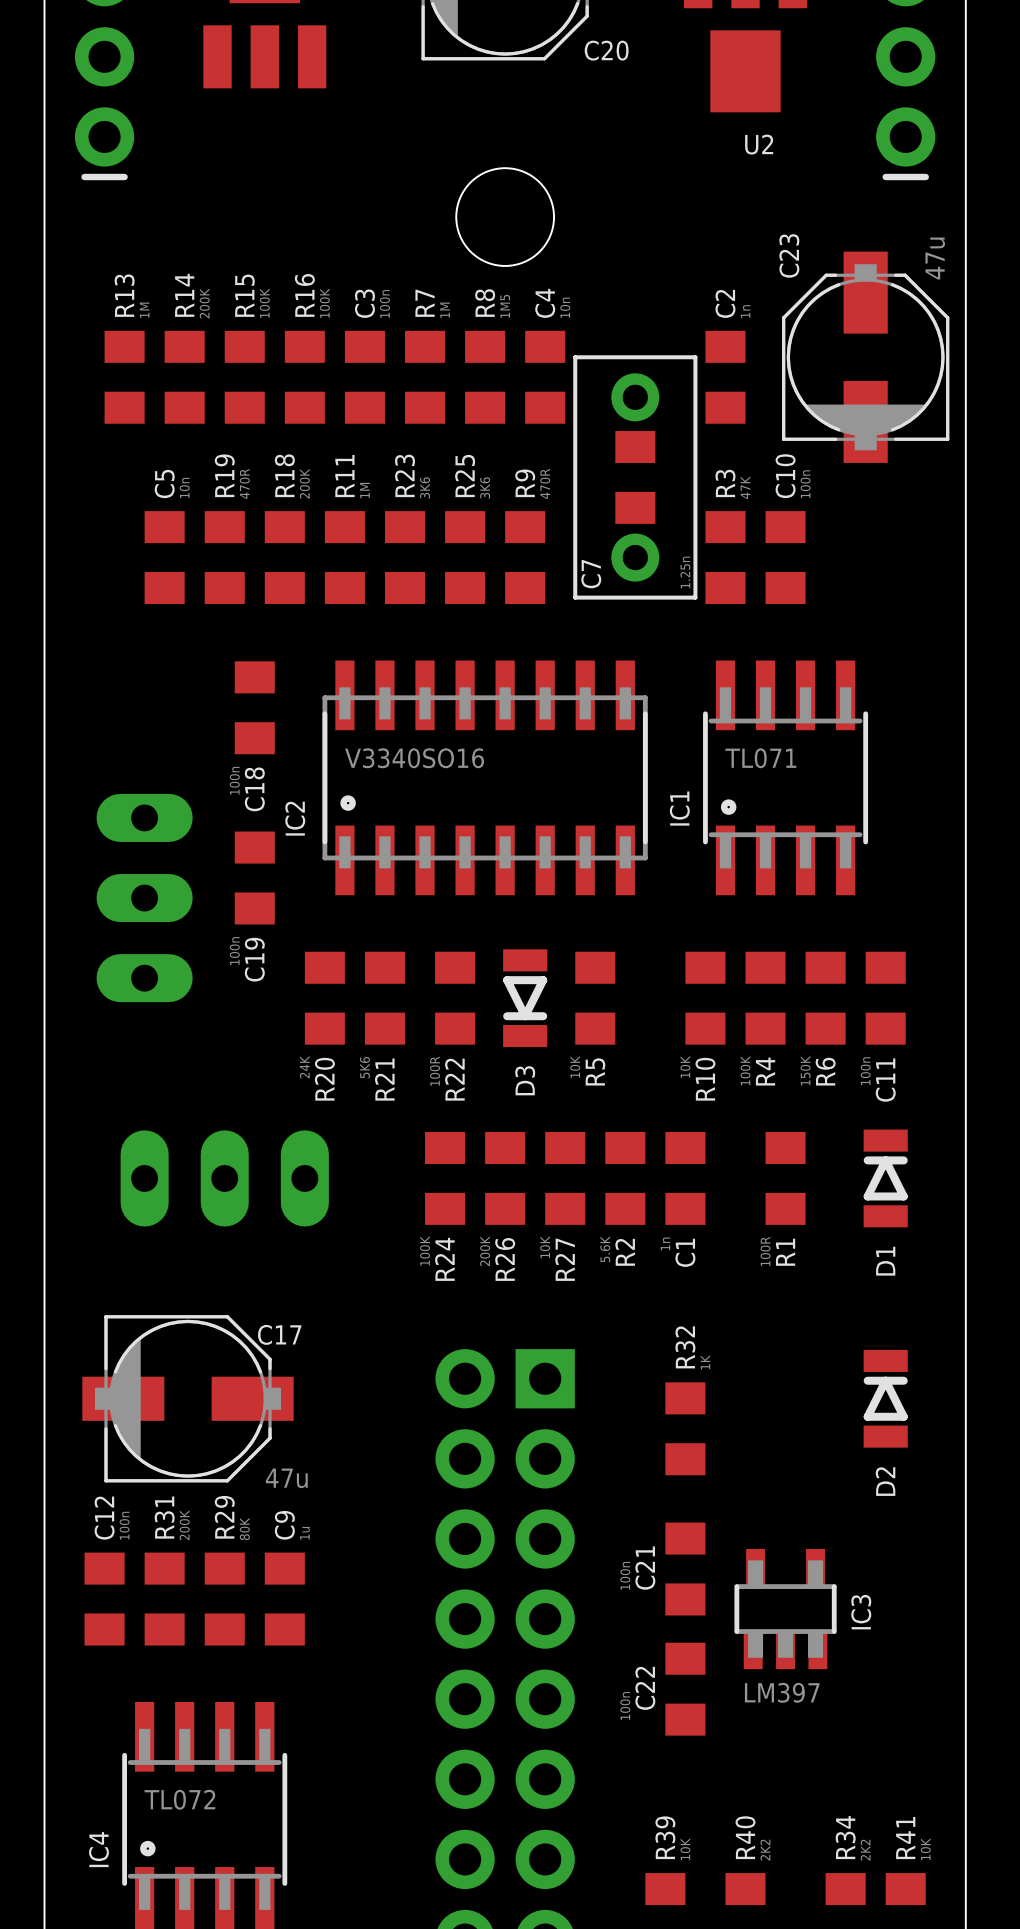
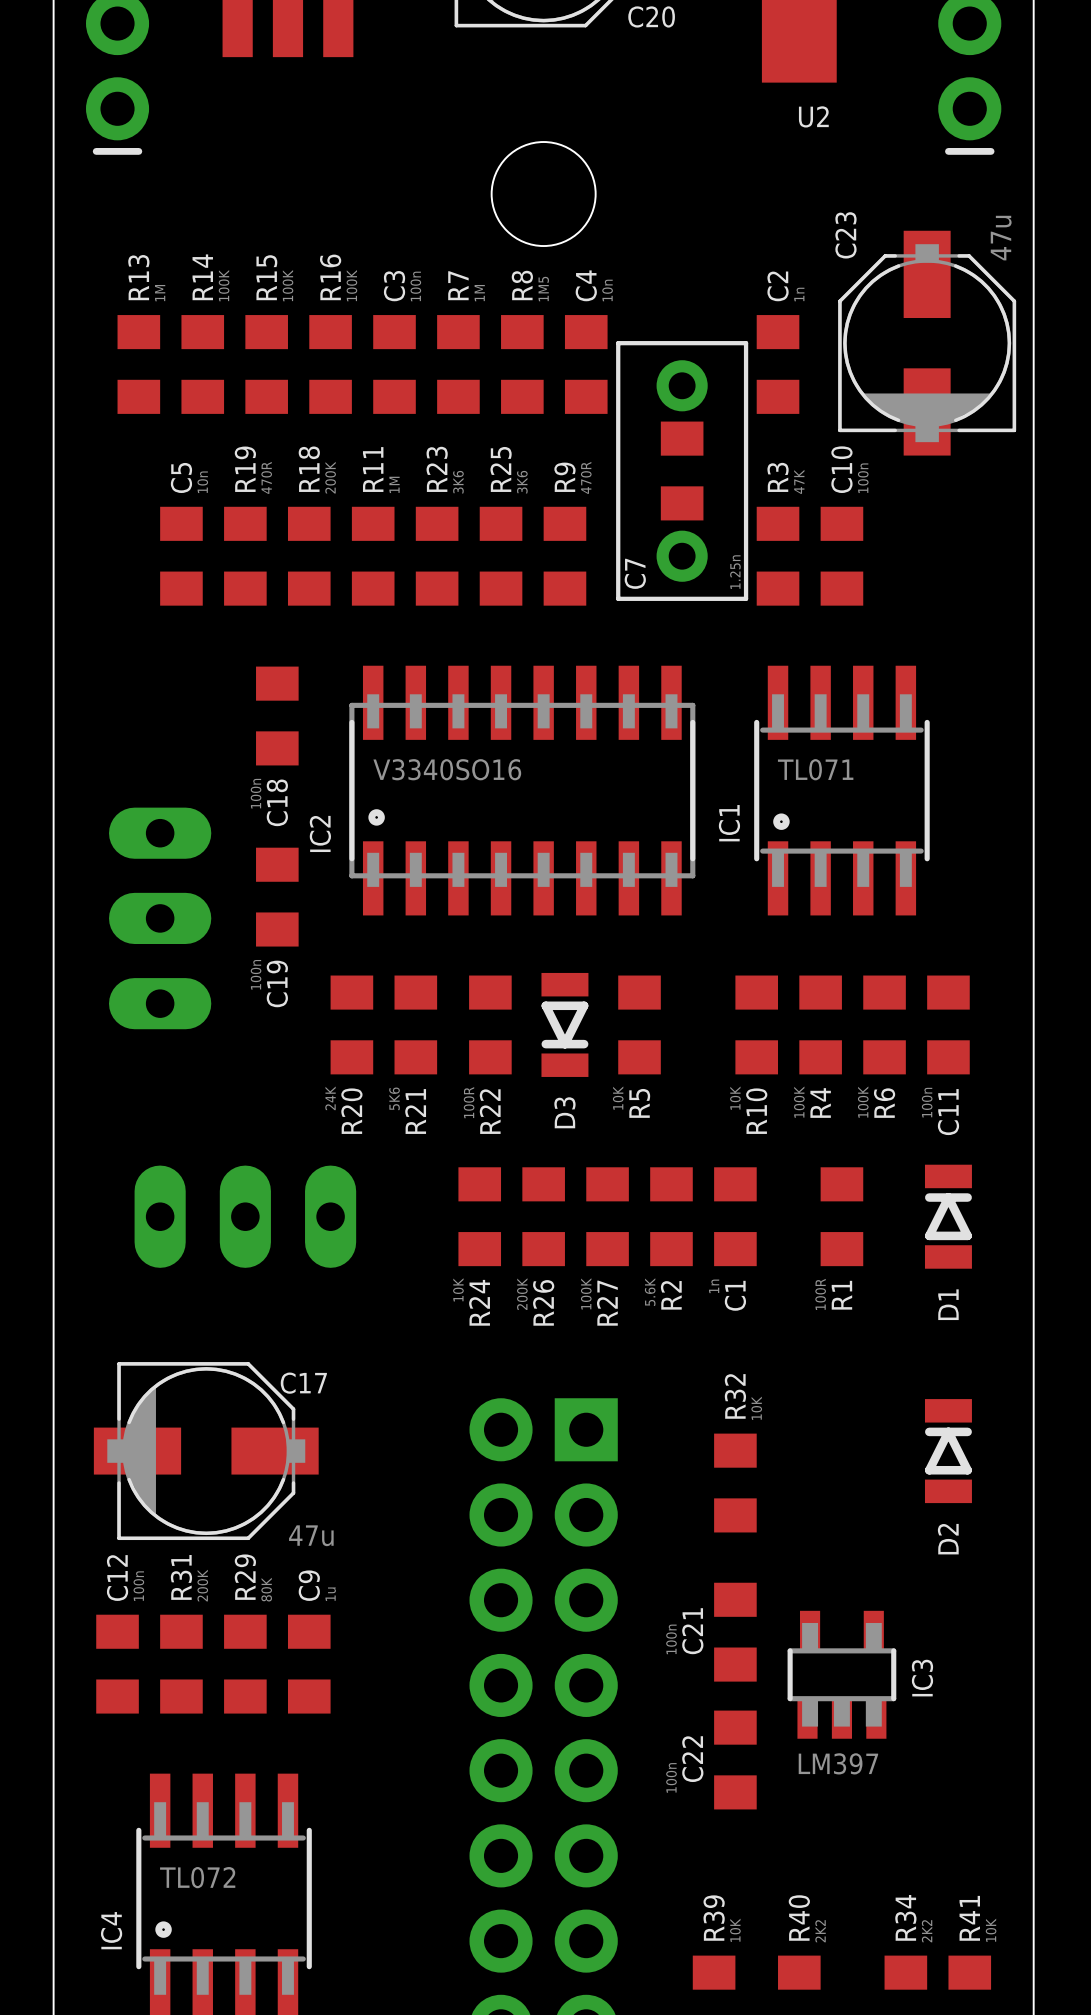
R14 value: 200K (204, 303) -> 100K (224, 285)
R6 value: 150K (805, 1070) -> 100K (863, 1102)
R27 value: 10K (545, 1247) -> 100K (586, 1293)
R24 value: 100K (425, 1250) -> 10K (458, 1289)
R32 value: 1K (705, 1362) -> 10K (756, 1408)

